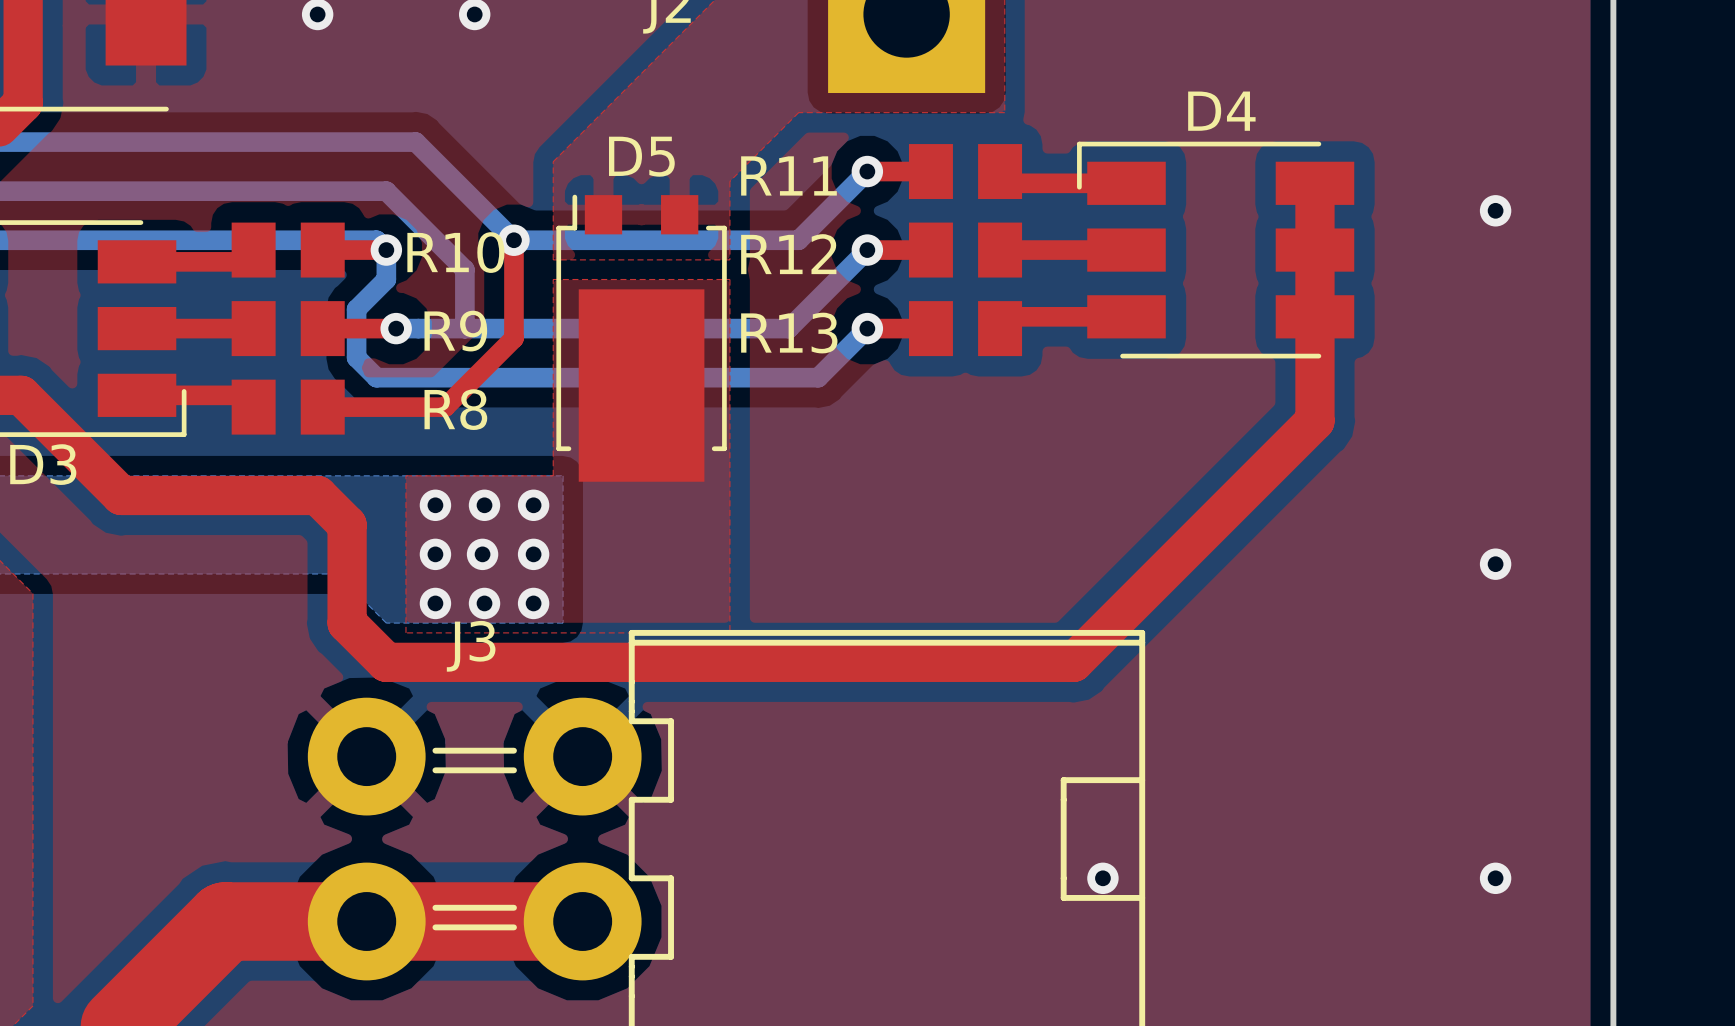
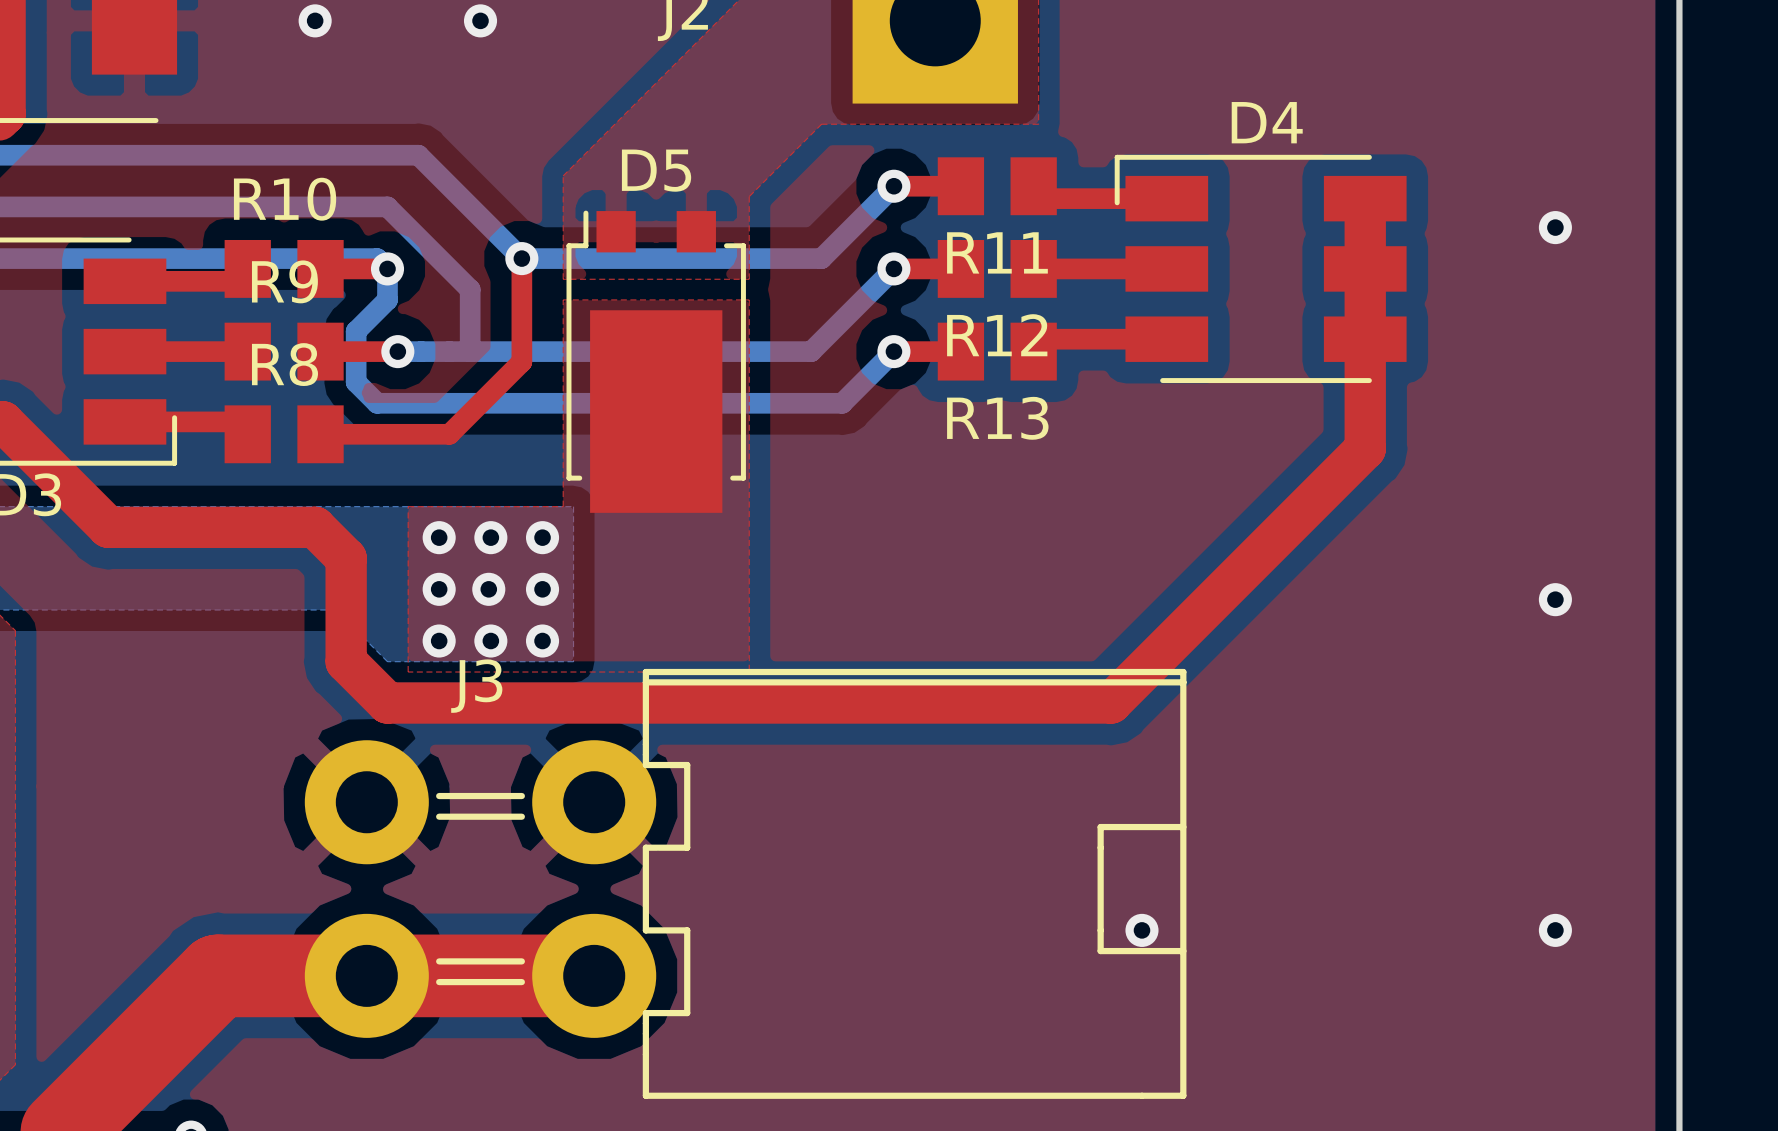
R11 name position: R11 (788, 175) -> R11 (997, 252)
R10 name position: R10 (455, 252) -> R10 (285, 199)
R12 name position: R12 (788, 254) -> R12 (997, 335)
R9 name position: R9 (455, 331) -> R9 (284, 281)
R13 name position: R13 (789, 333) -> R13 (997, 418)
R8 name position: R8 (455, 409) -> R8 (284, 364)

